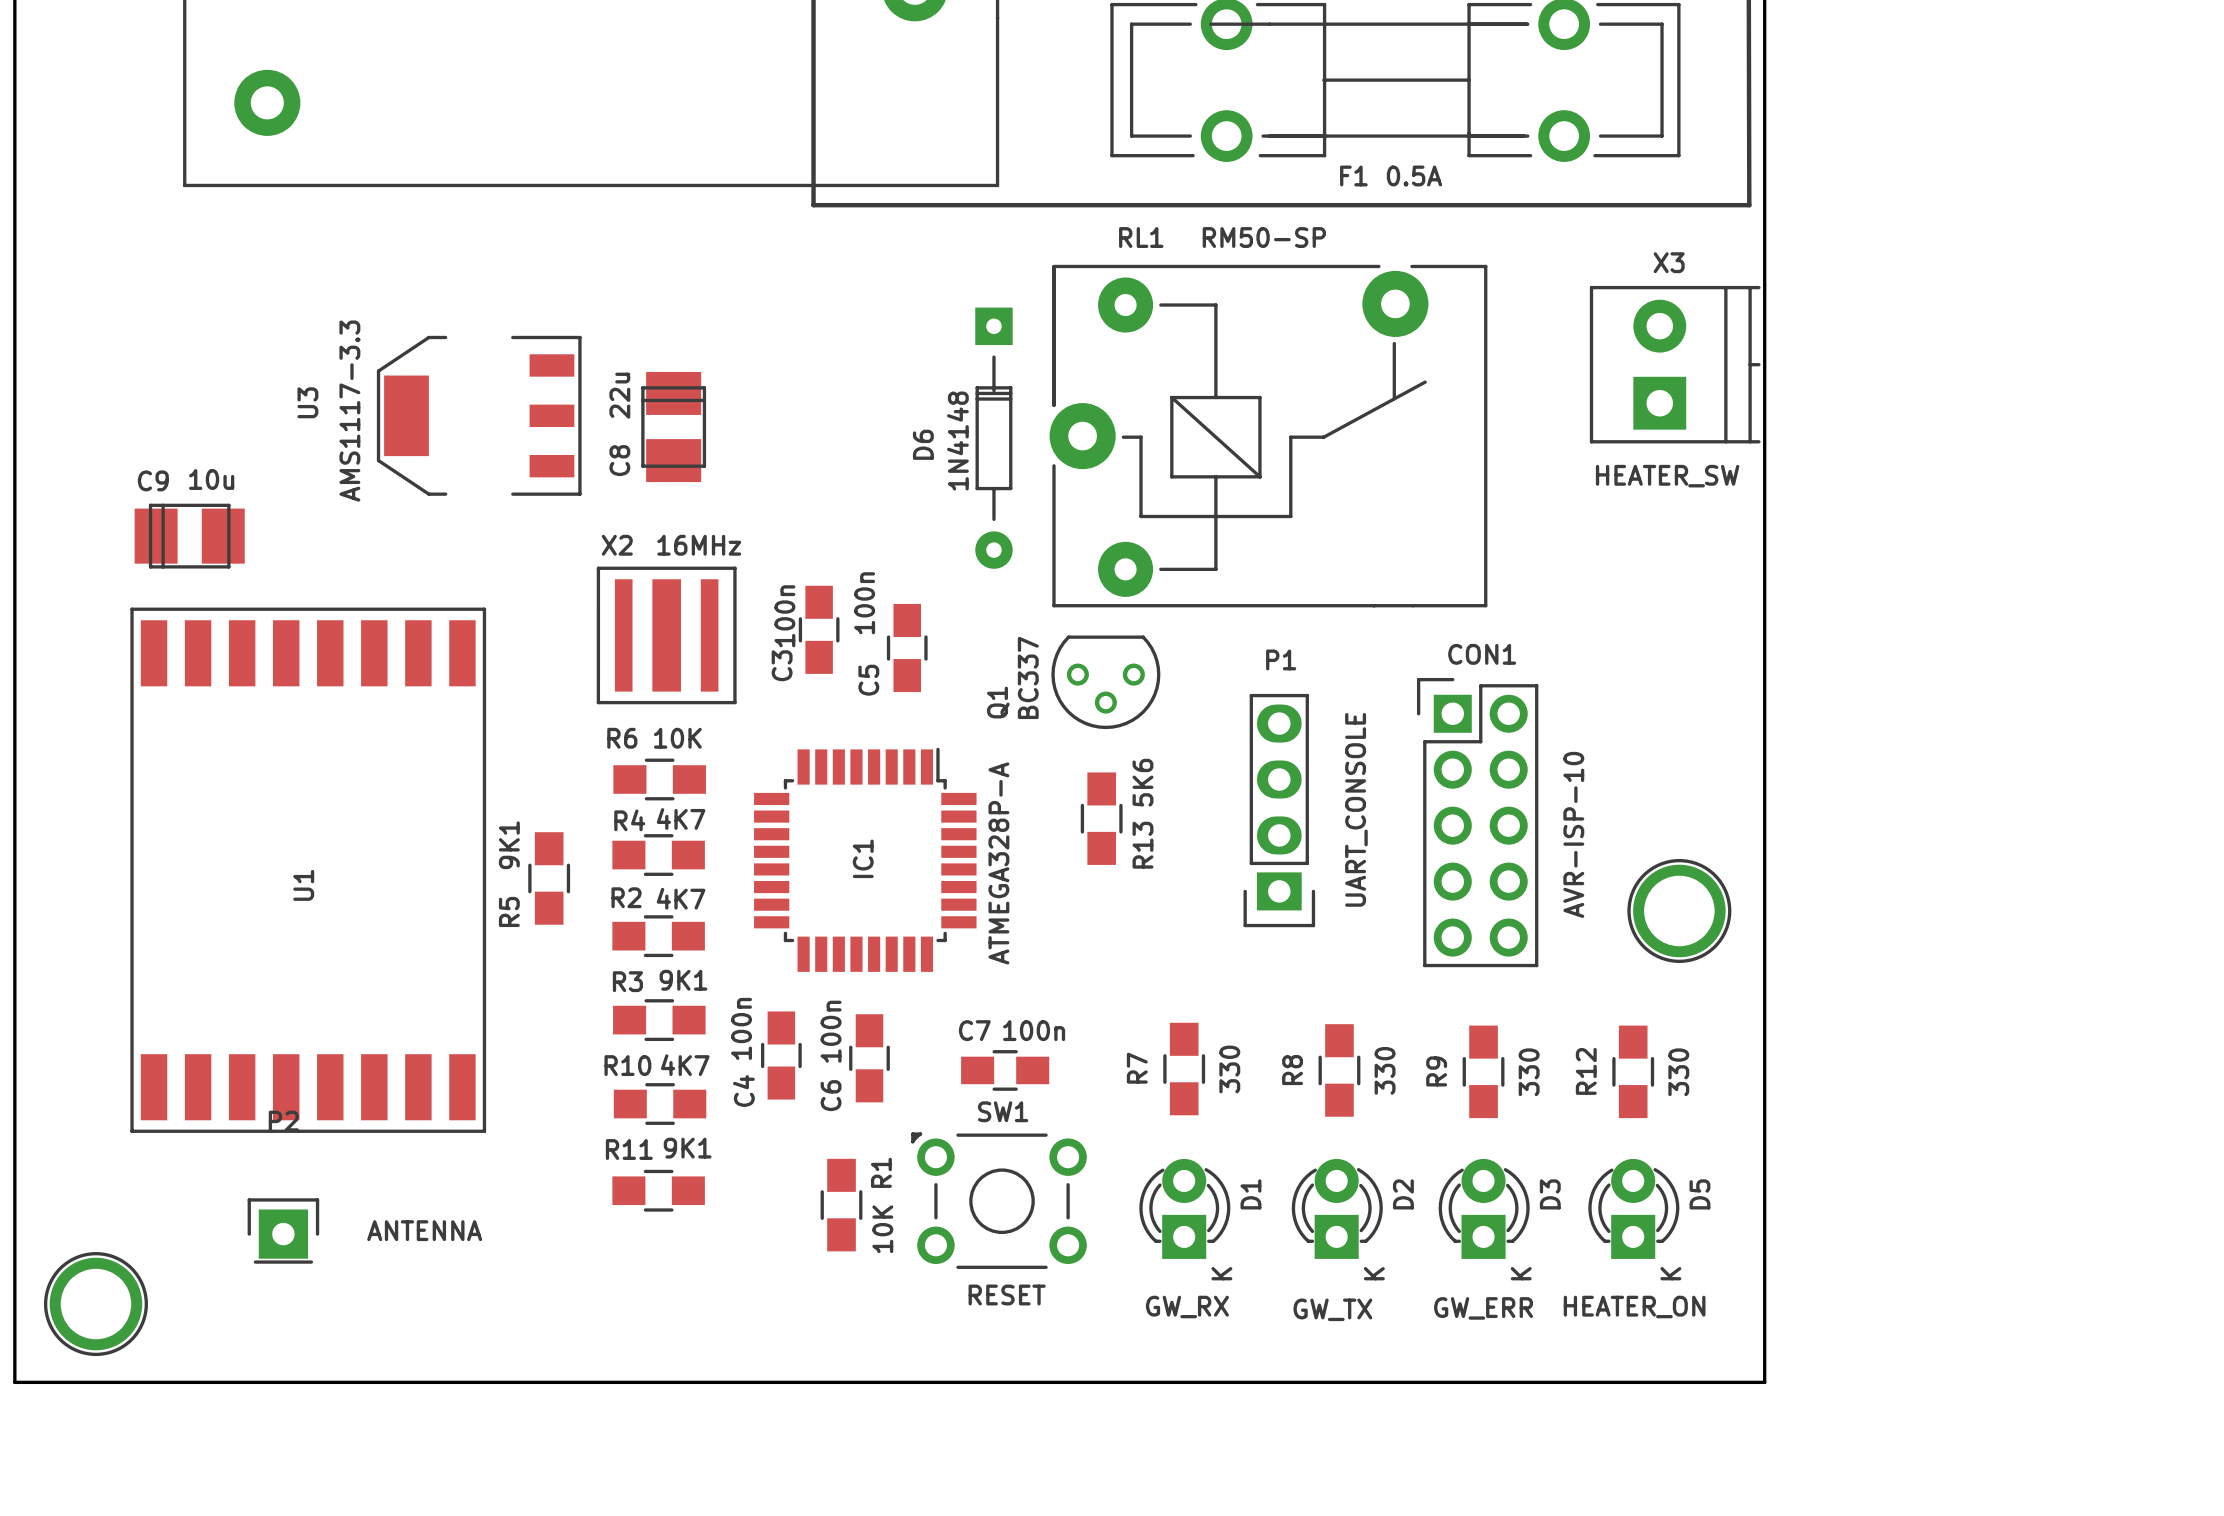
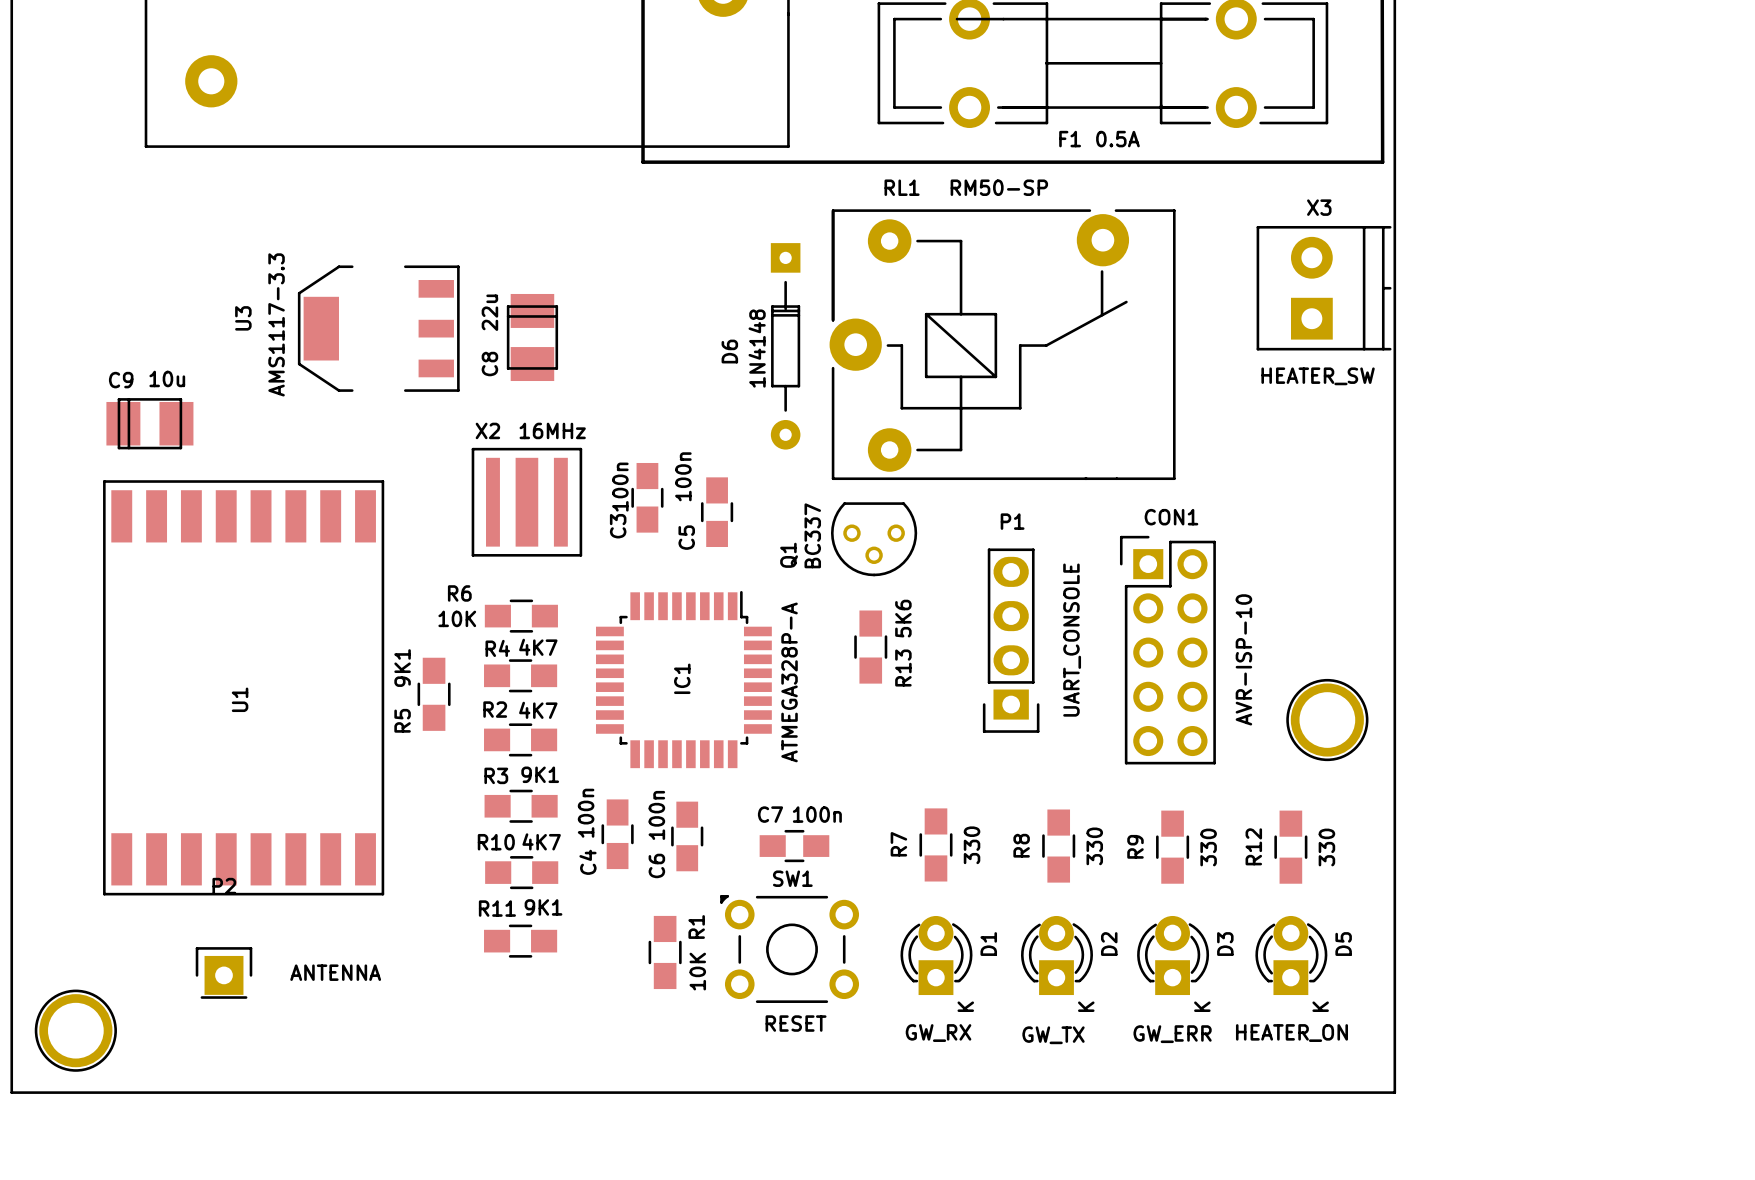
R6 name position: R6 (622, 738) -> R6 (459, 593)
R6 value position: 10K (677, 738) -> 10K (457, 618)

